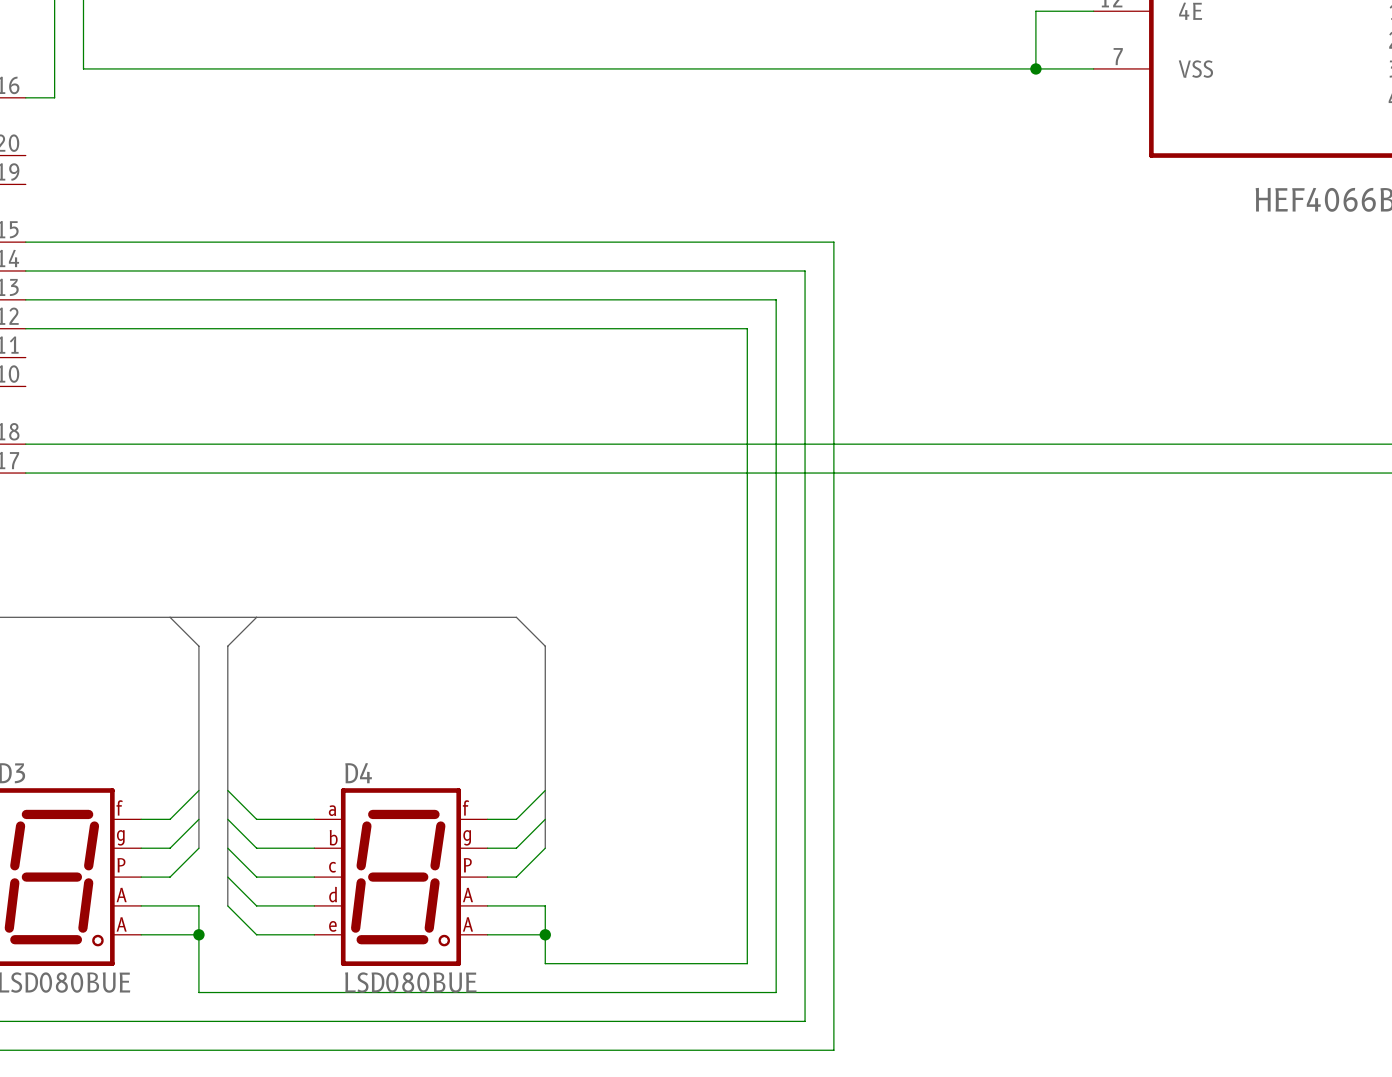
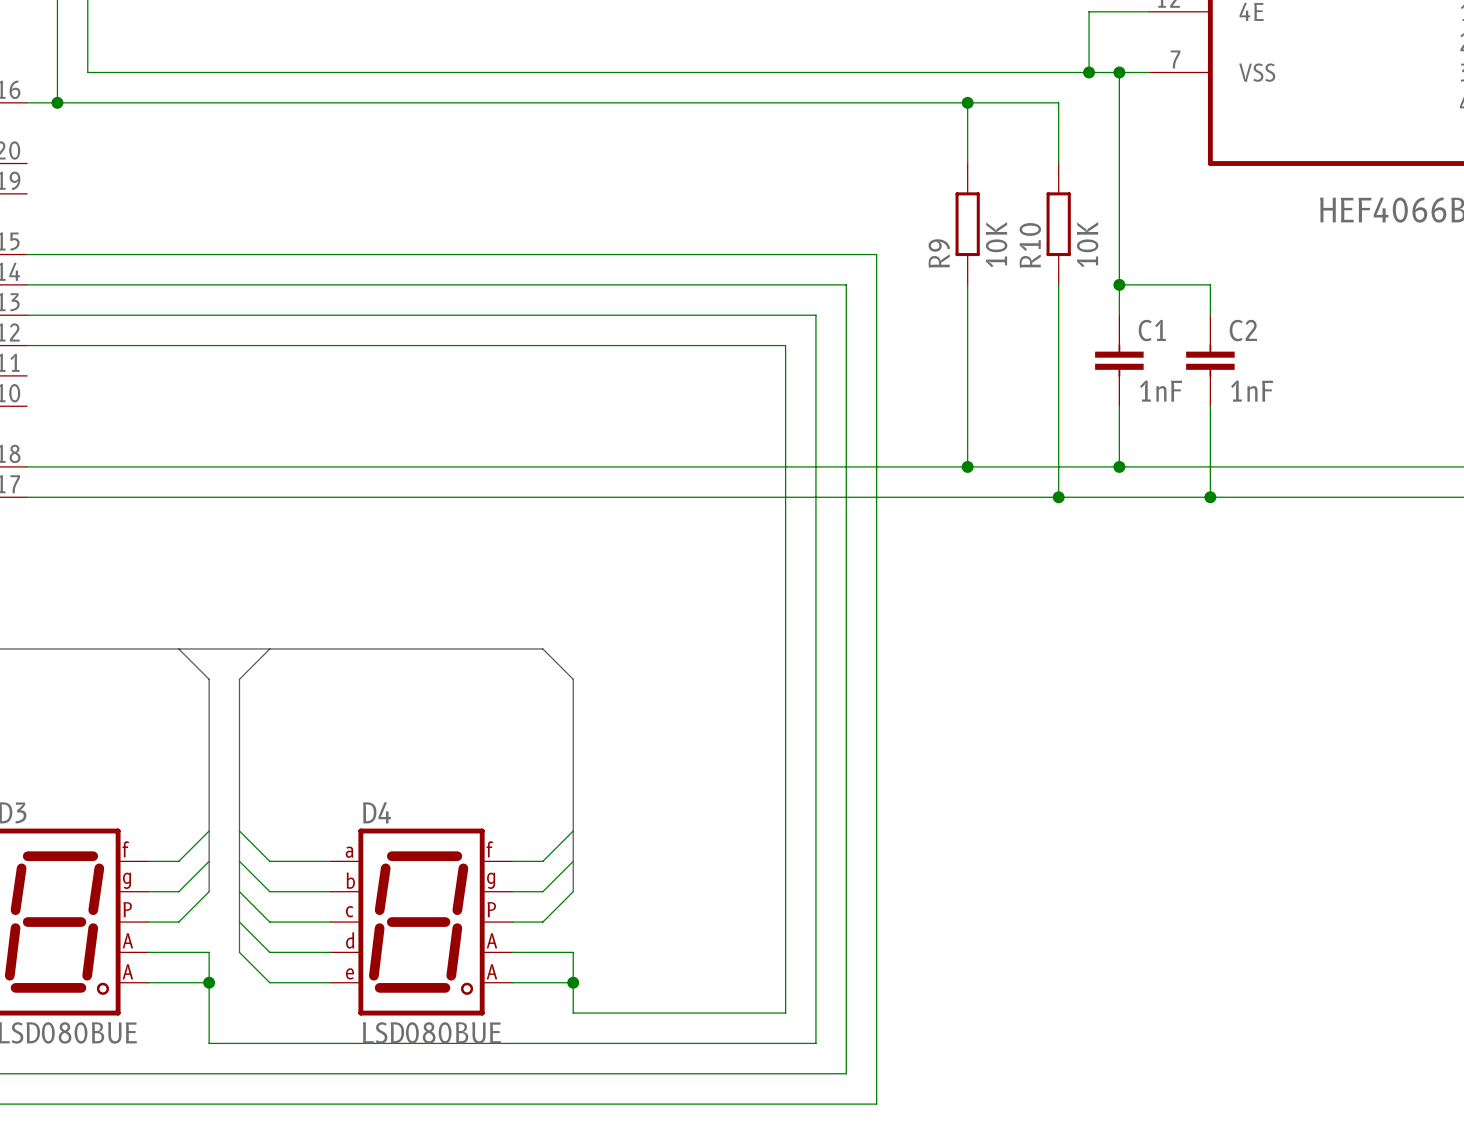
wire: none -> (1119, 72) (1119, 315)
junction: none -> (1119, 72)
wire: none -> (57, 102) (1058, 102) (1058, 163)
junction: none -> (57, 102)
wire: none -> (967, 102) (967, 163)
junction: none -> (967, 102)
R9: none -> 10K (967, 224)
R10: none -> 10K (1058, 224)
wire: none -> (967, 284) (967, 466)
wire: none -> (1058, 284) (1058, 497)
wire: none -> (1119, 284) (1210, 284) (1210, 315)
junction: none -> (1119, 284)
C1: none -> 1nF (1119, 360)
C2: none -> 1nF (1210, 360)
wire: none -> (1119, 406) (1119, 466)
wire: none -> (1210, 406) (1210, 497)
junction: none -> (967, 466)
junction: none -> (1119, 466)
junction: none -> (1058, 497)
junction: none -> (1210, 497)

